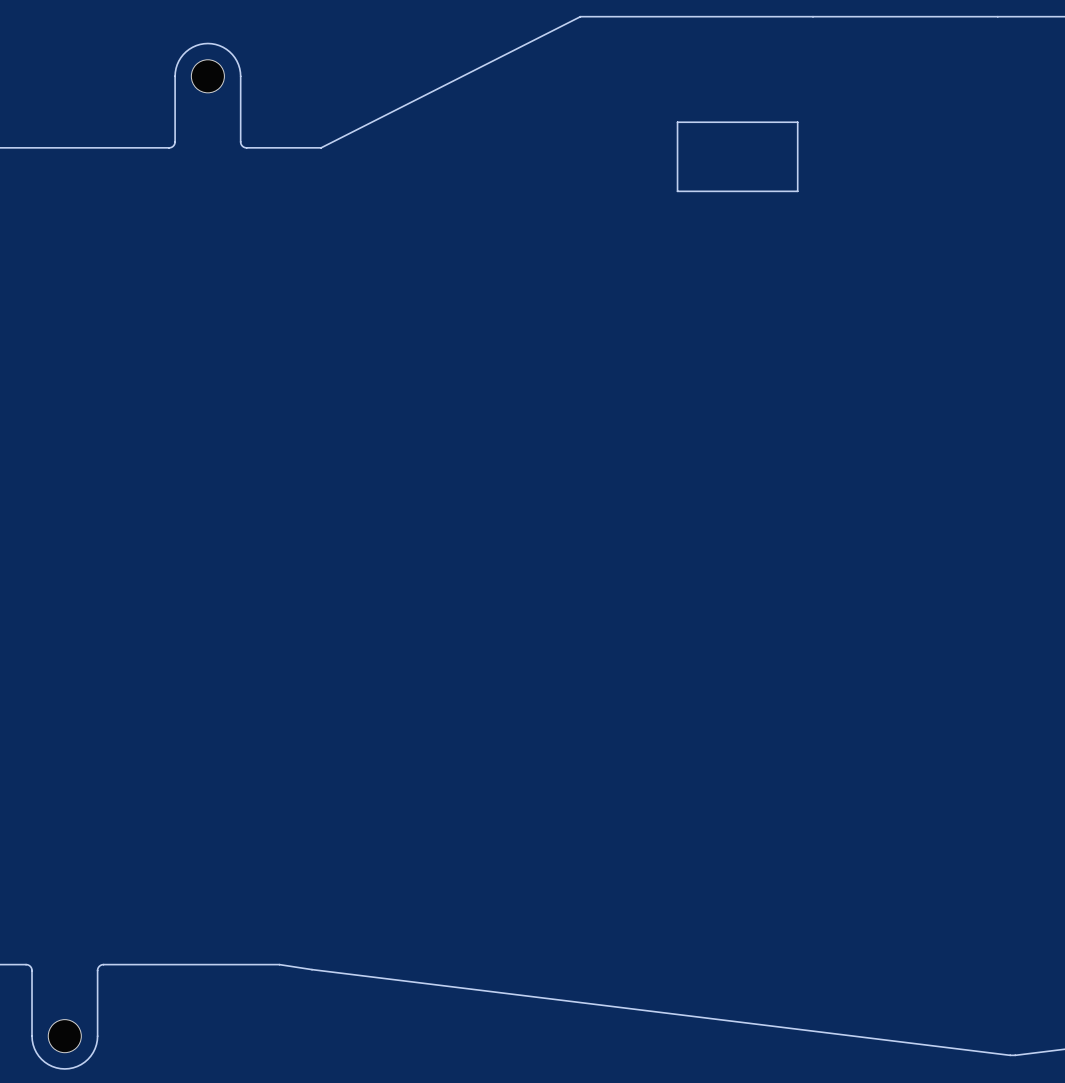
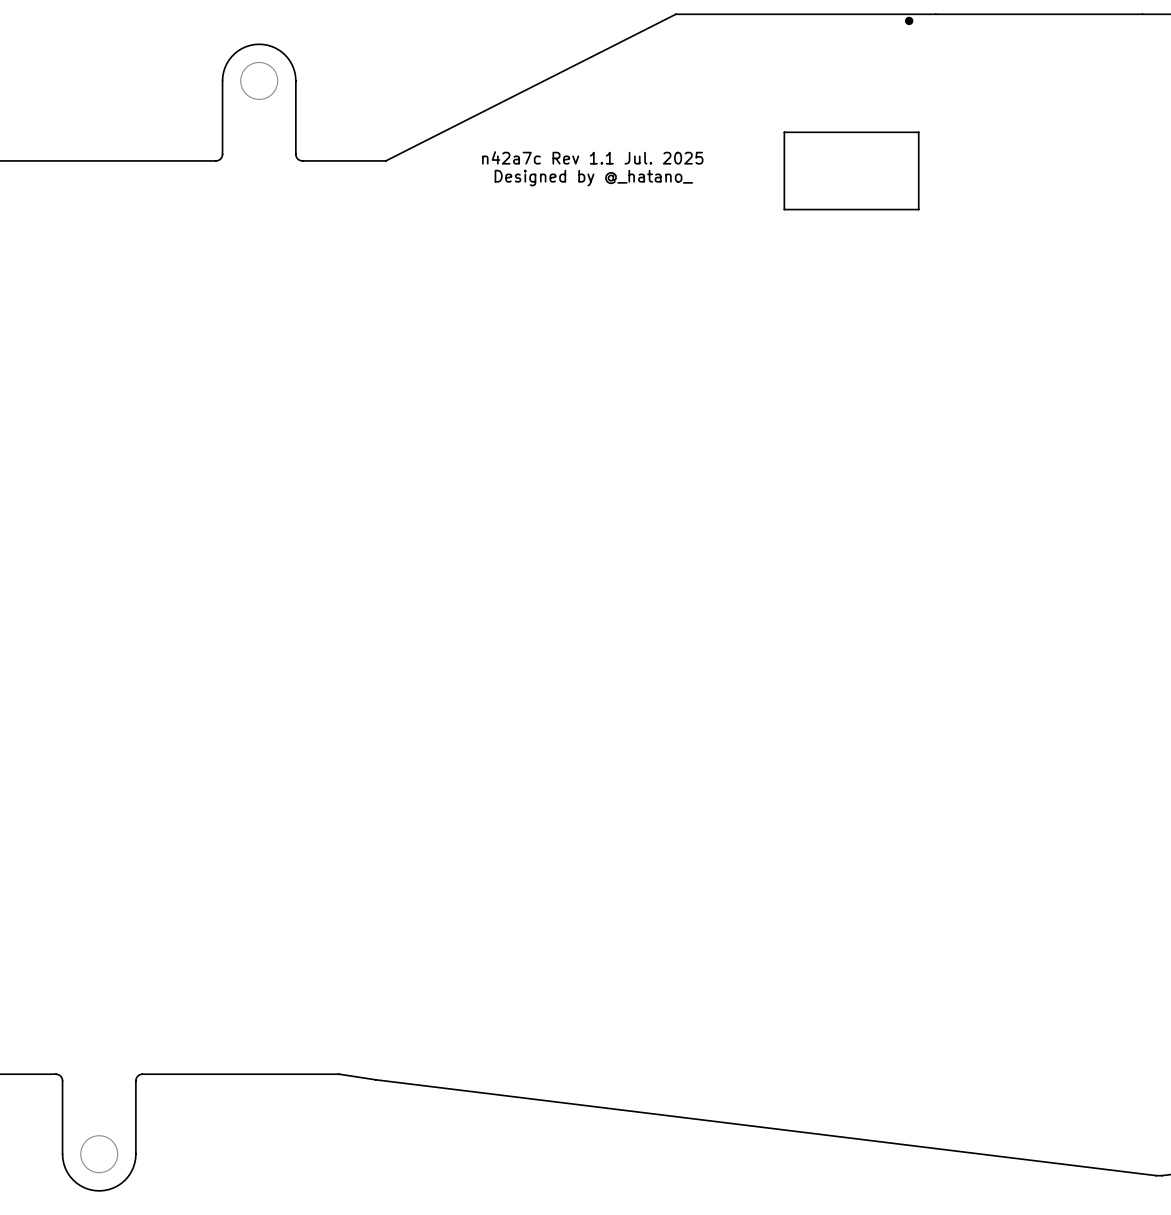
drawing: none -> [904, 16, 914, 26]
text: none -> n42a7c Rev 1.1 Jul. 2025 (592, 157)
text: none -> Designed by @_hatano_ (593, 178)

